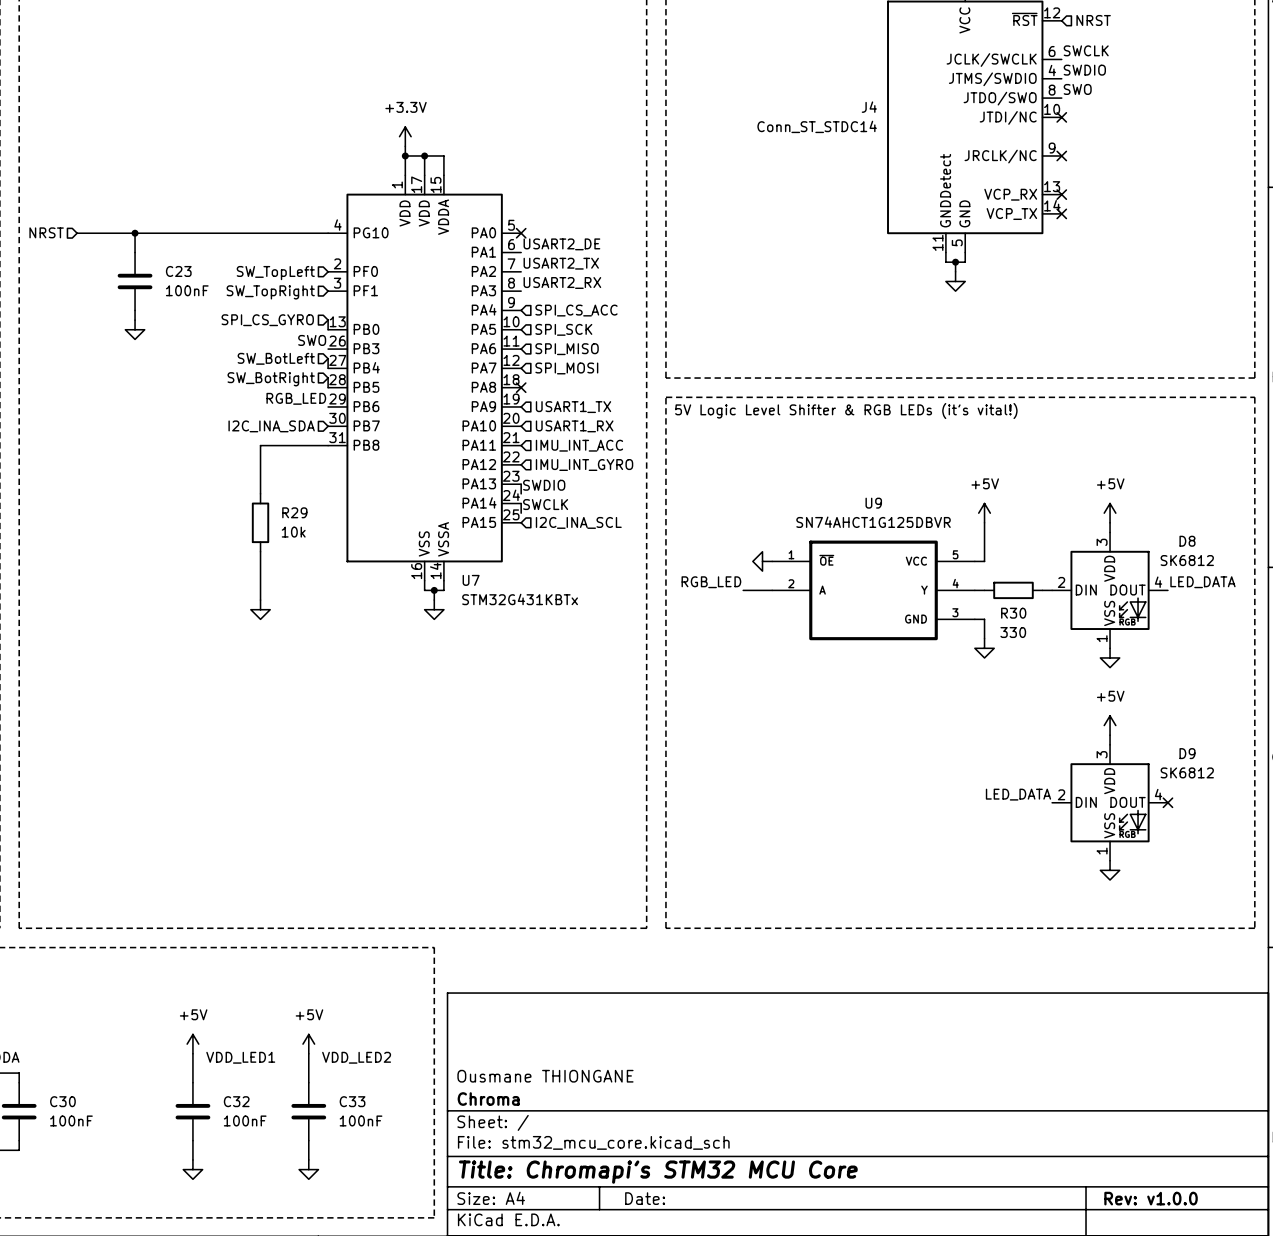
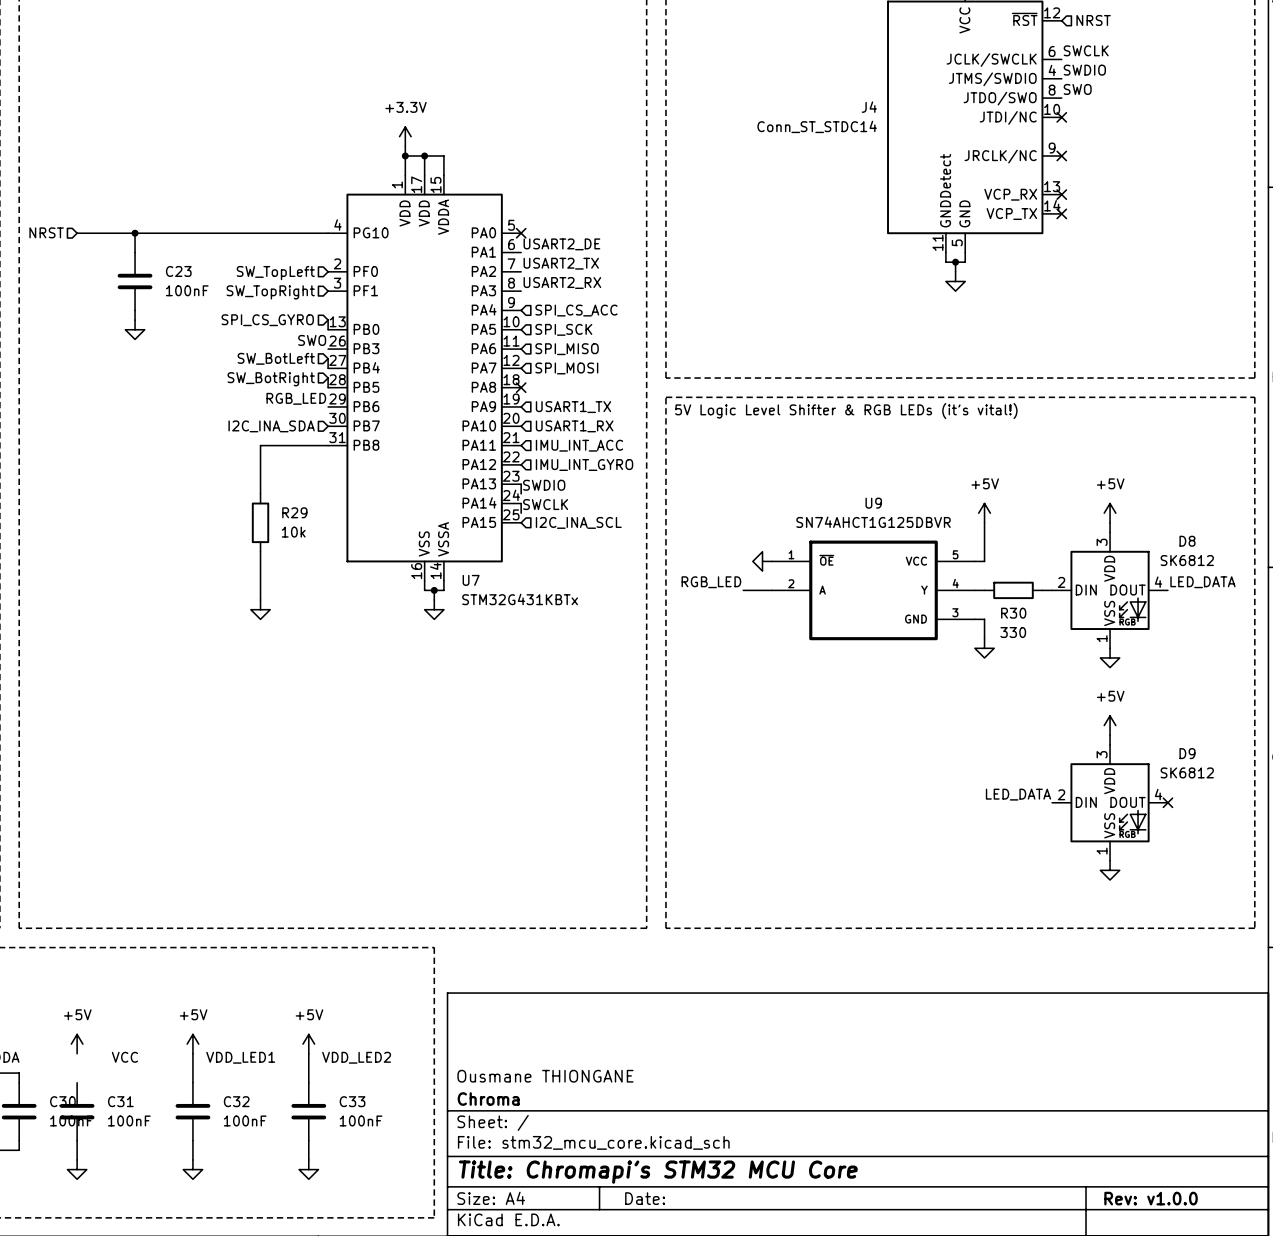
power symbol: none -> +5V (77, 1044)
text: none -> VCC (124, 1057)
C31: none -> 100nF (77, 1111)
wire: none -> (77, 1140) (77, 1159)
power symbol: none -> (77, 1169)

